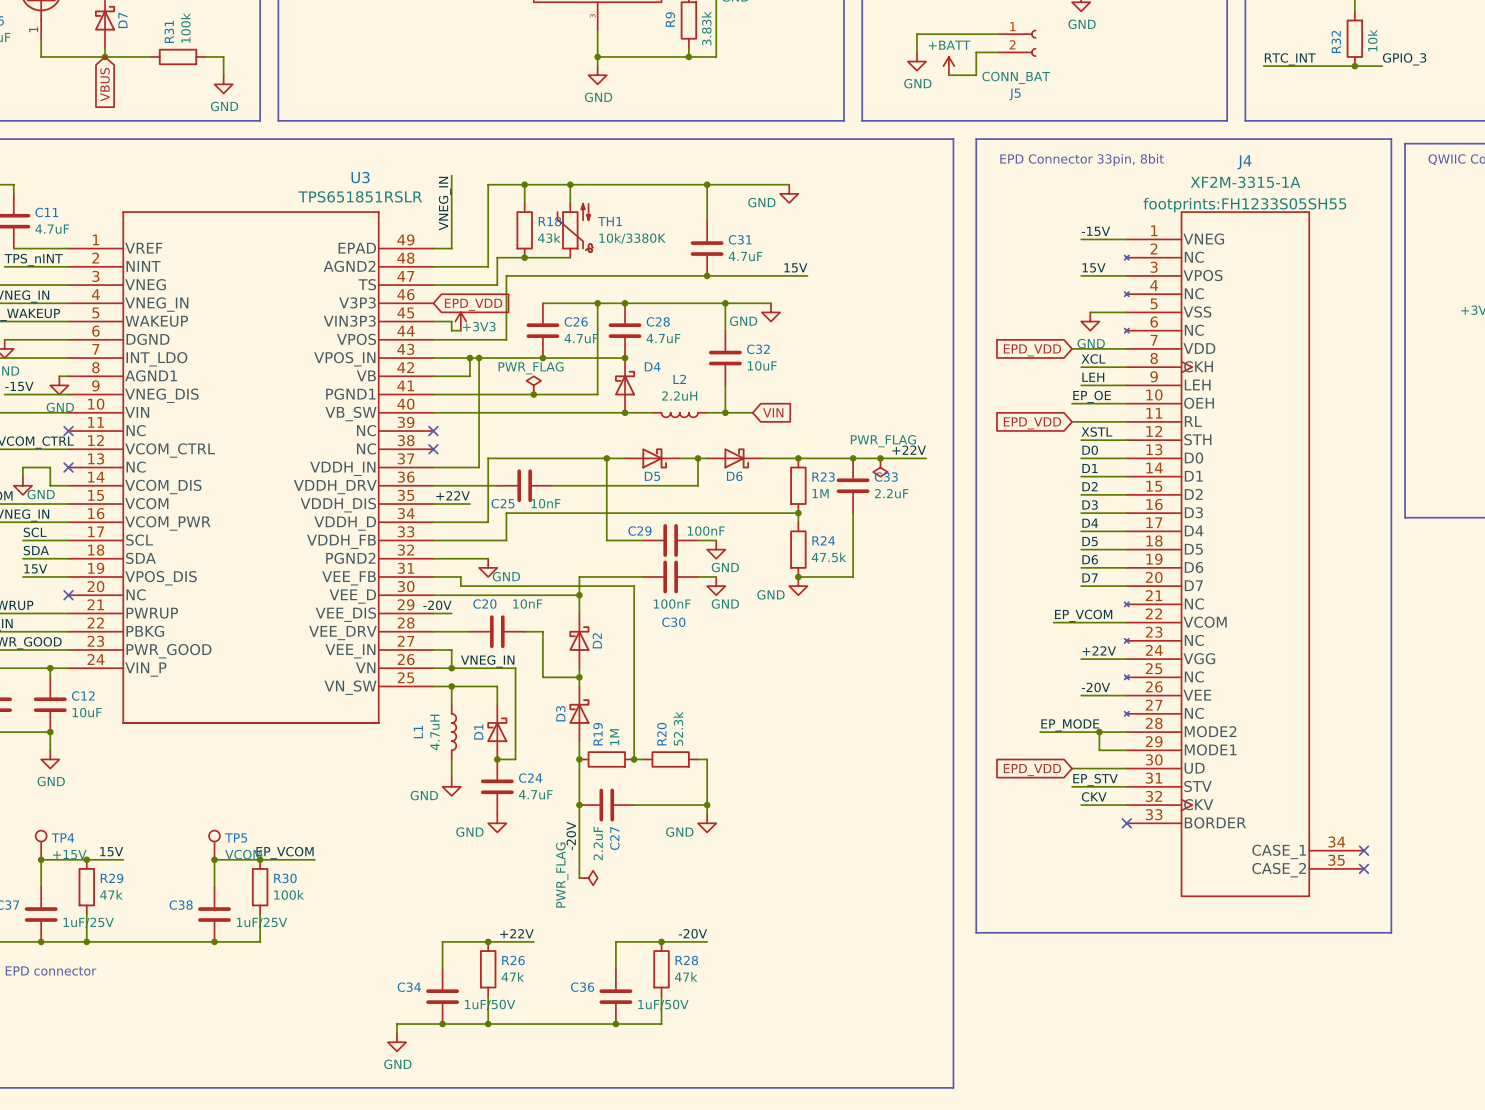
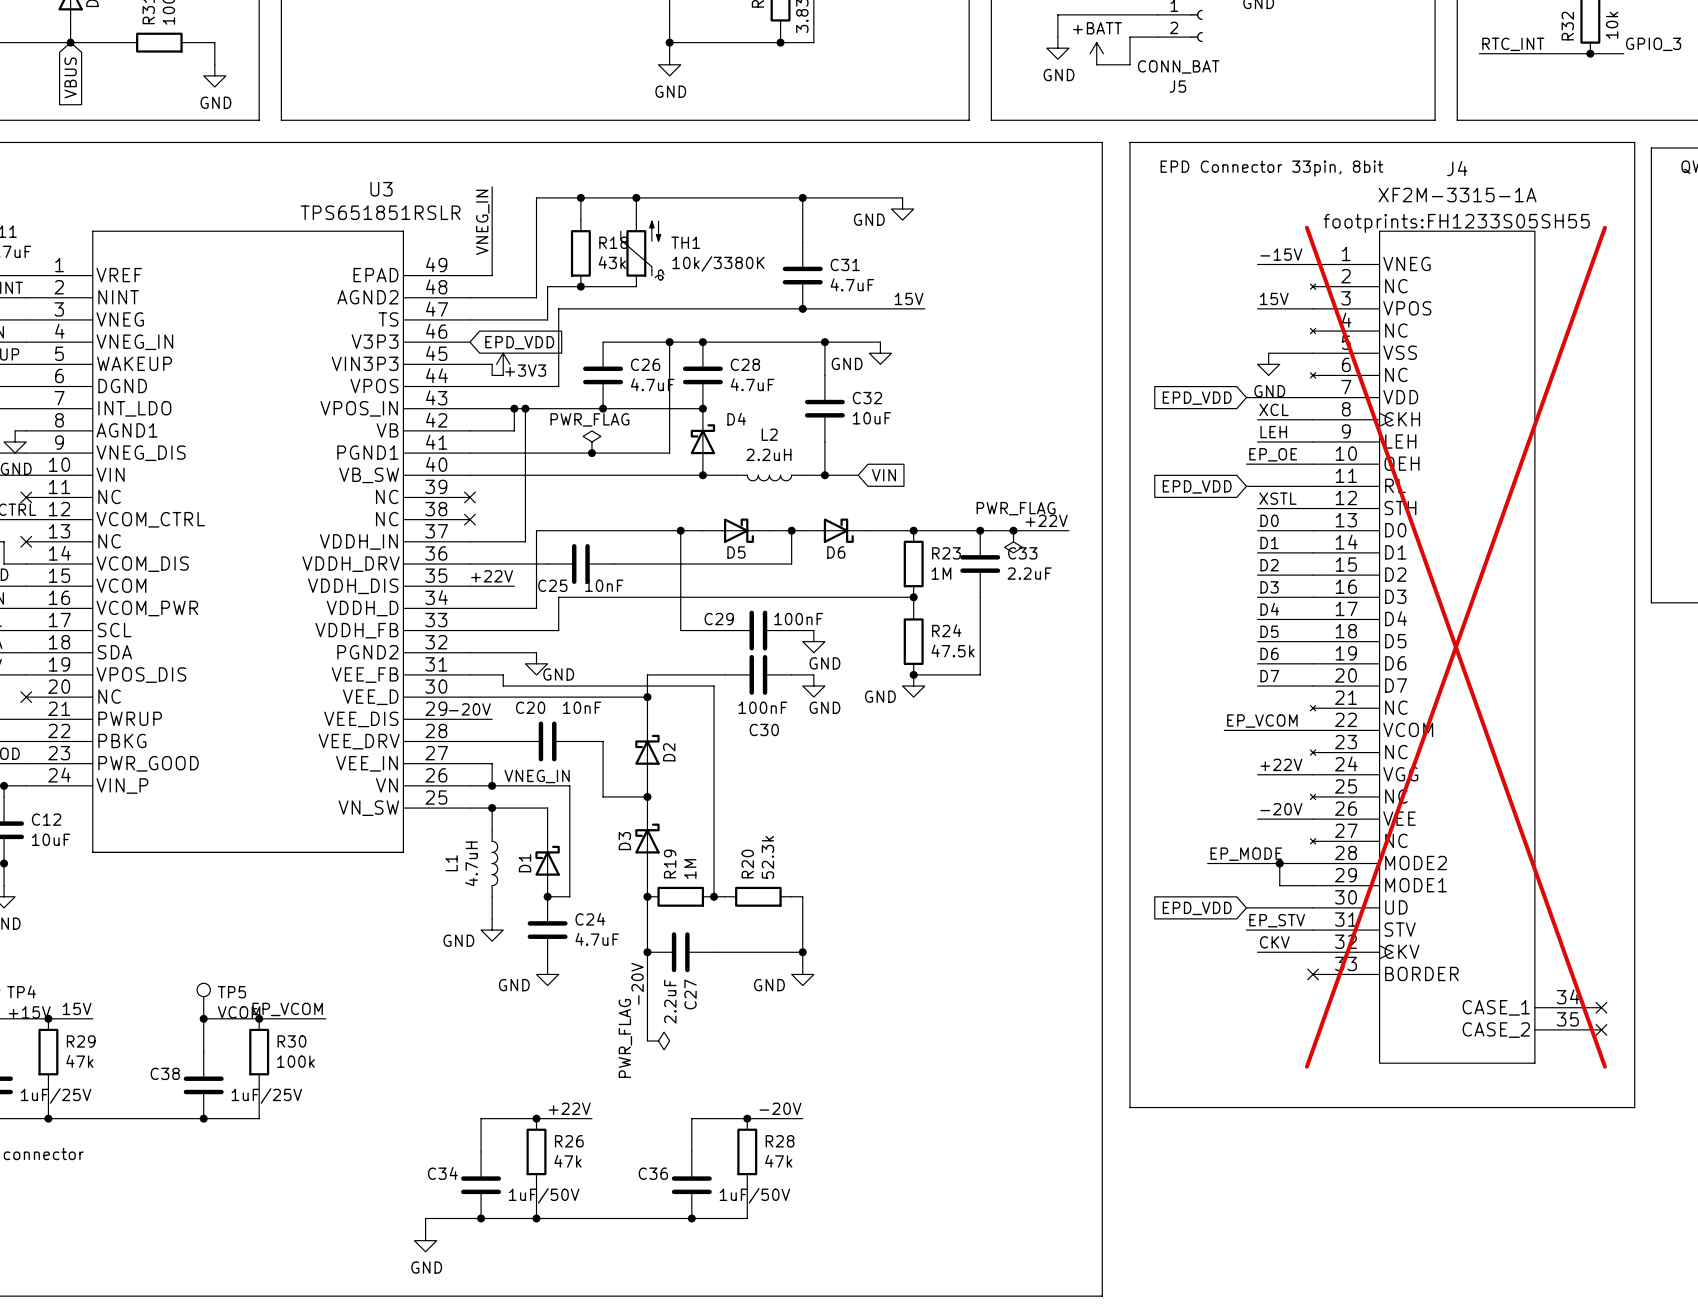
J4 do-not-place cross: none -> (1455, 647)

